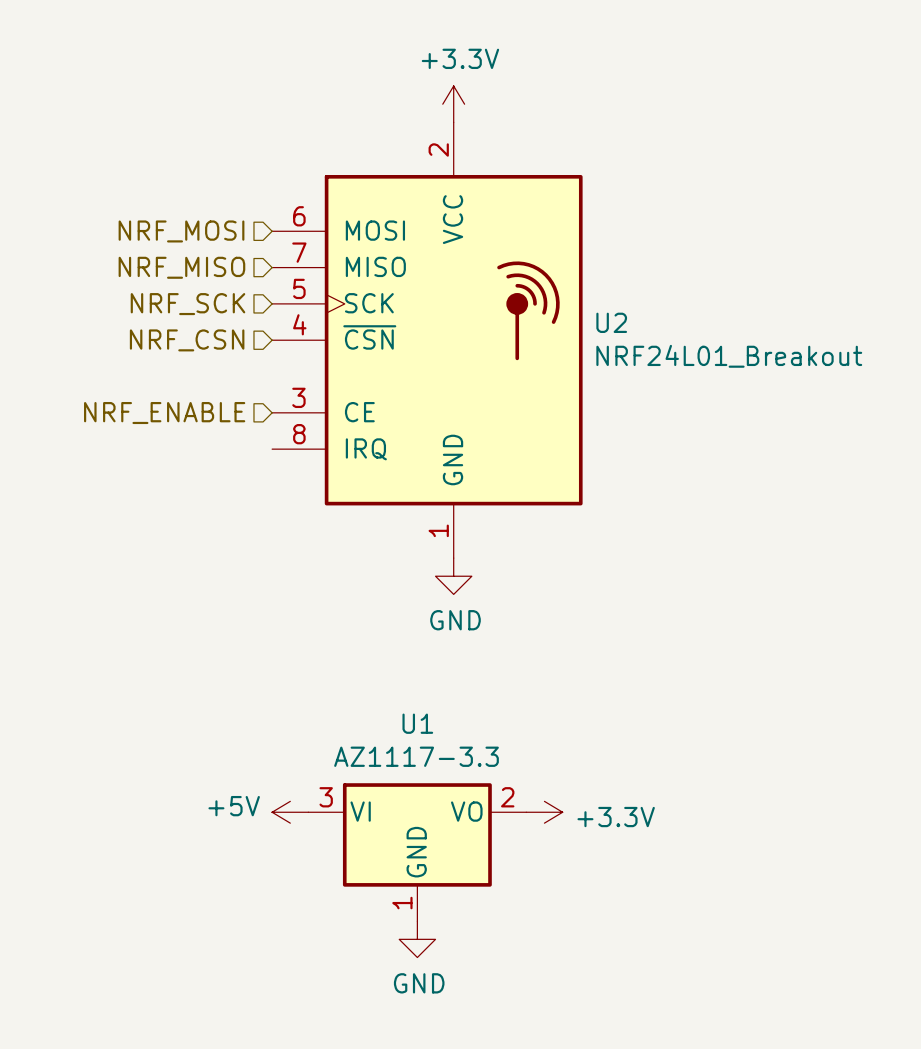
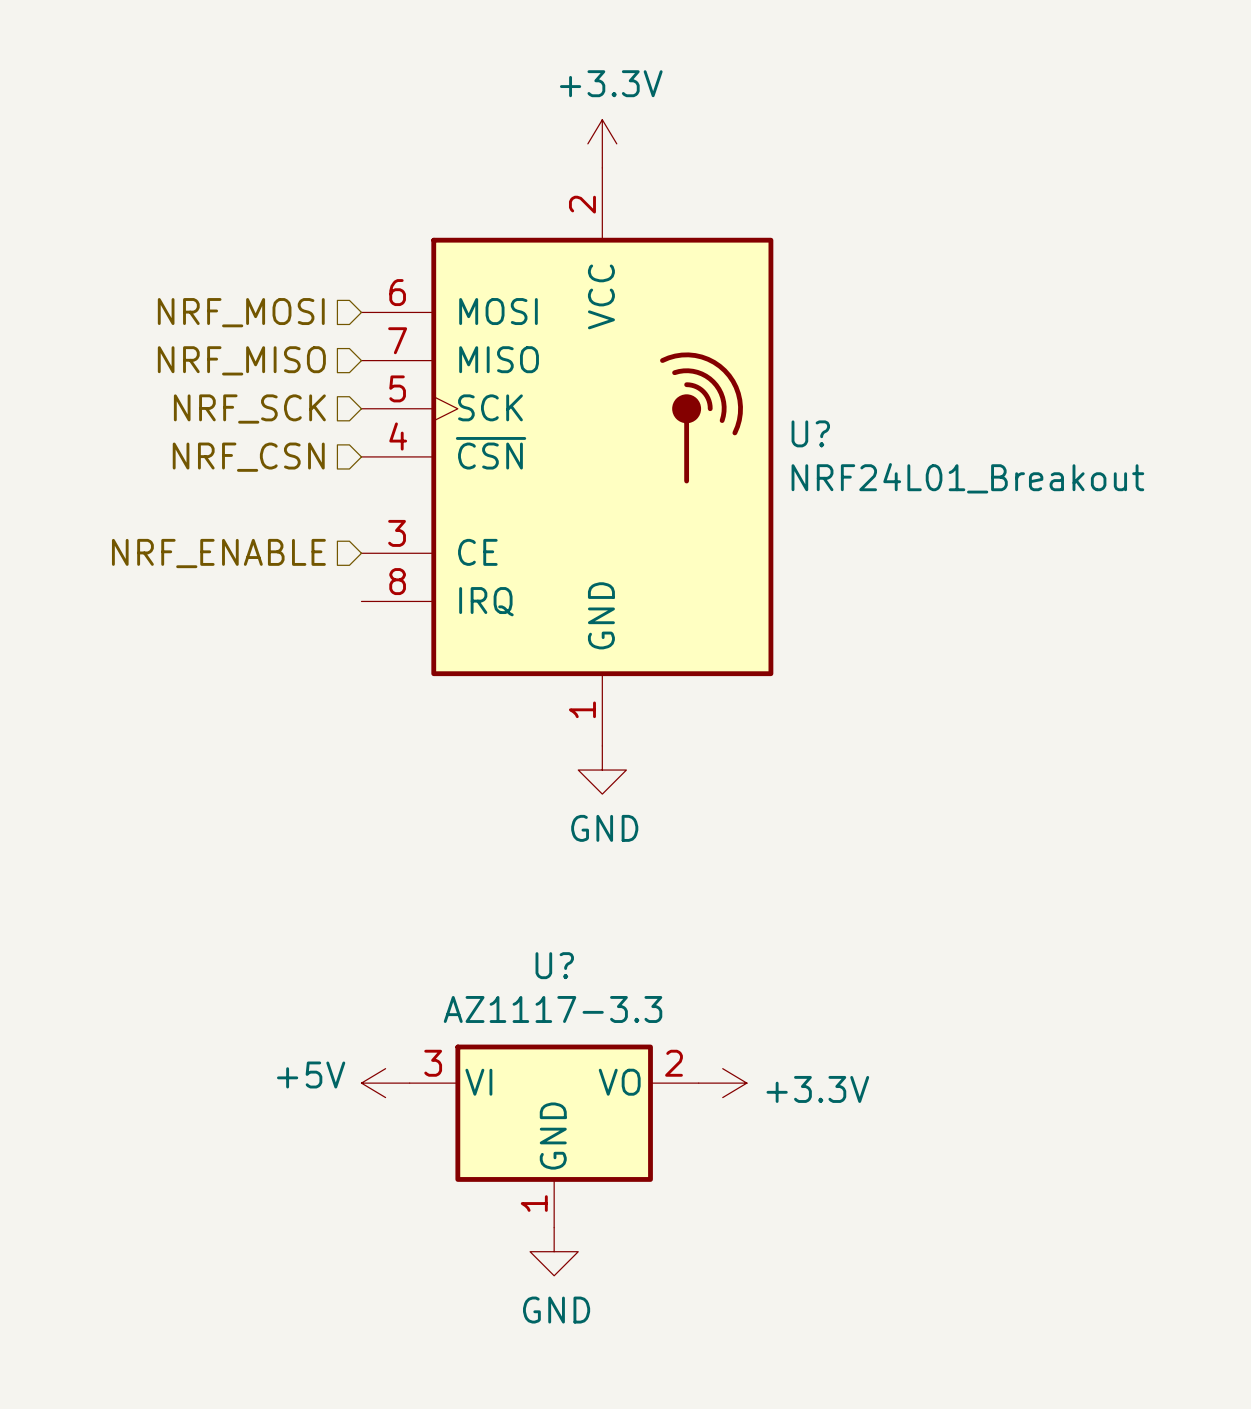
U2 name: U2 (611, 322) -> U? (810, 433)
U1 name: U1 (417, 723) -> U? (554, 965)

